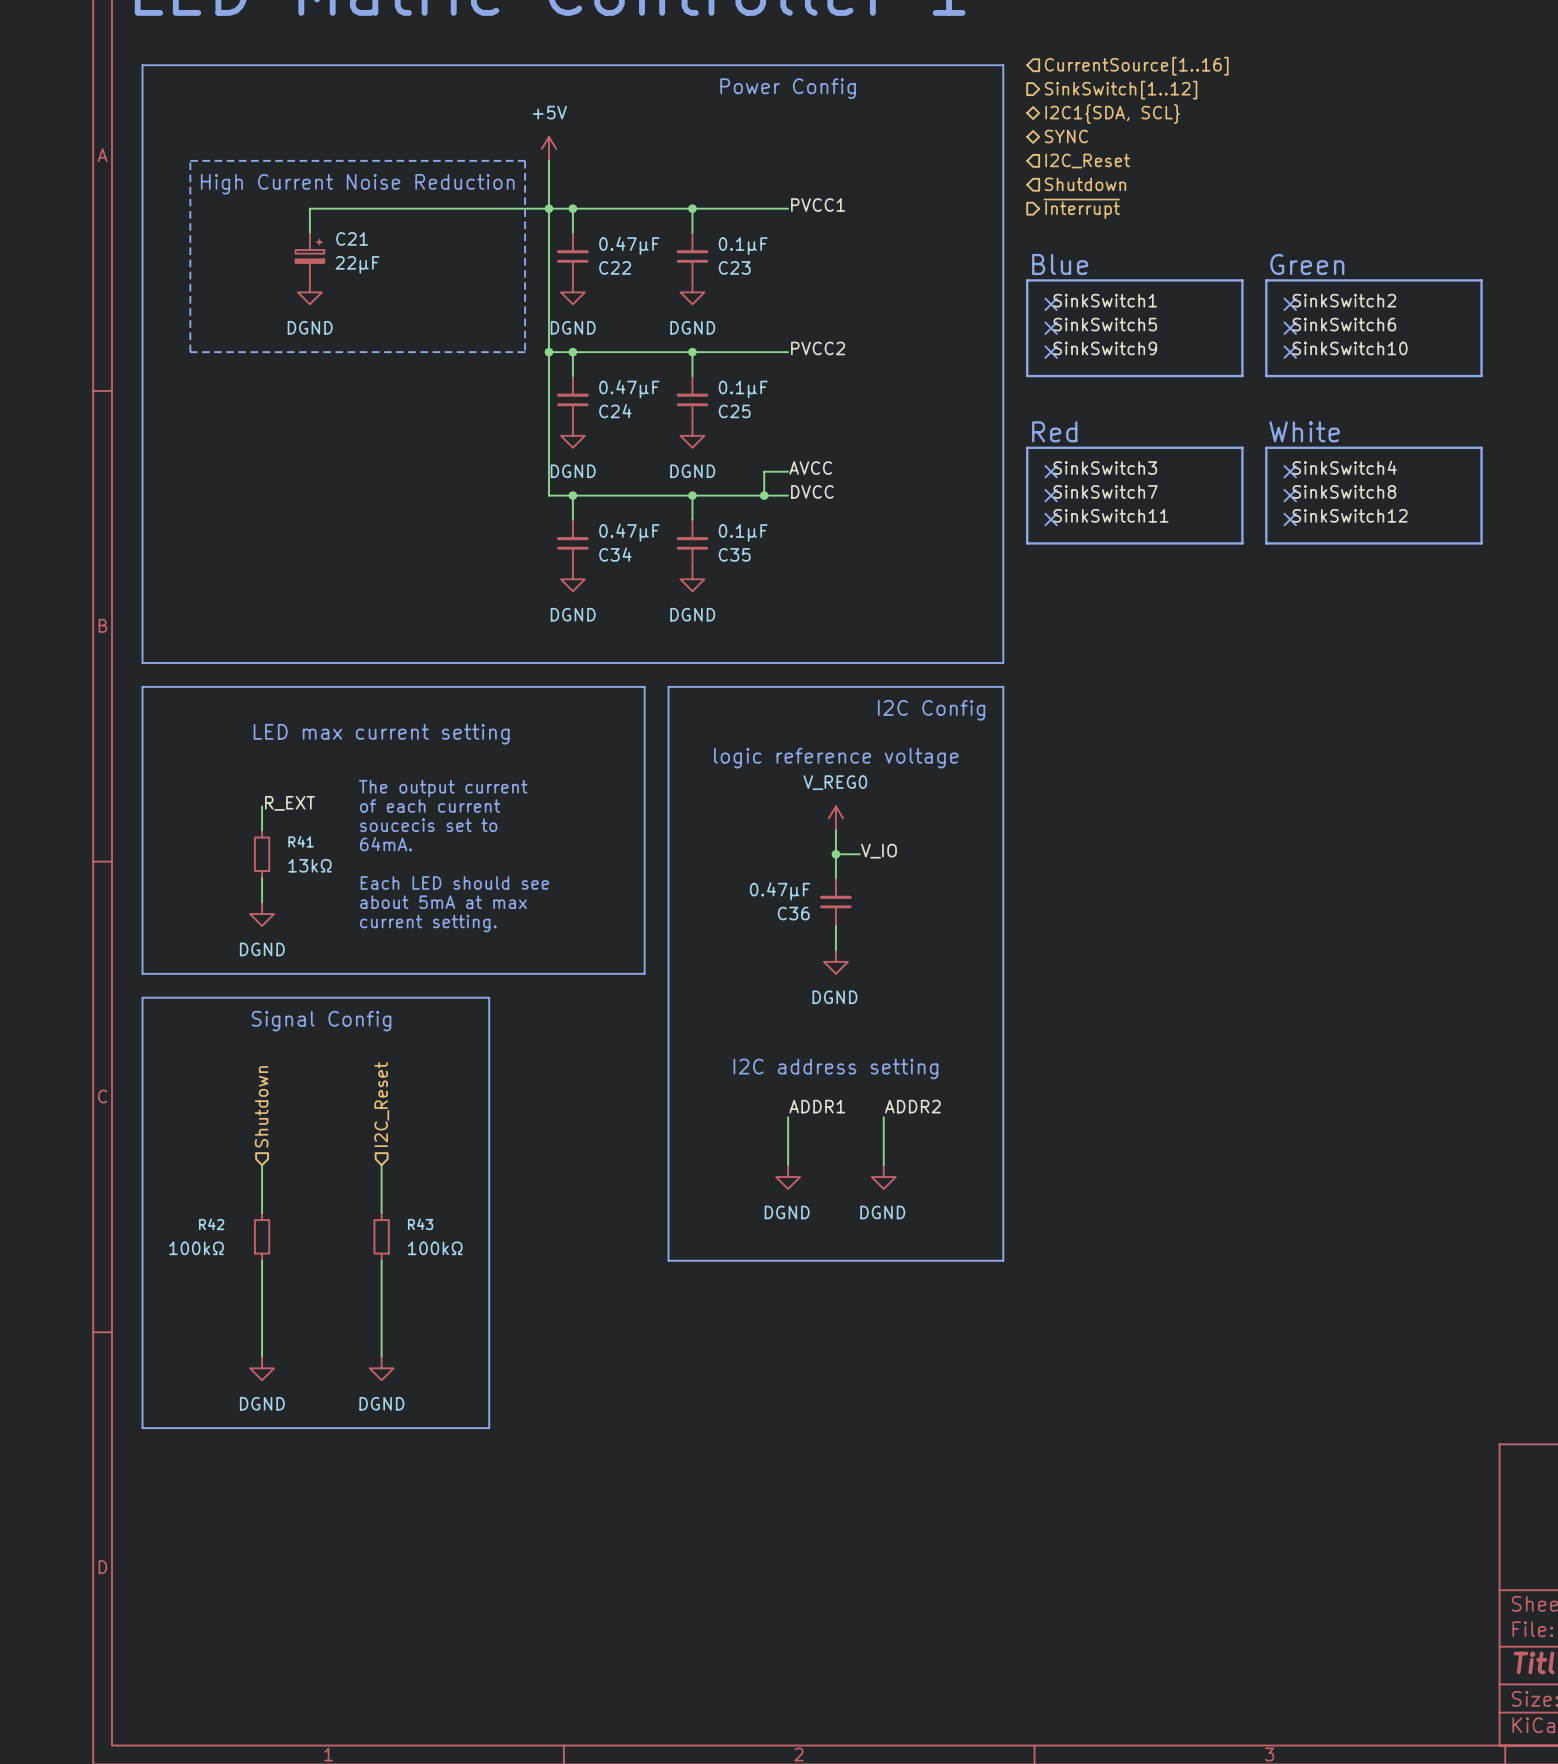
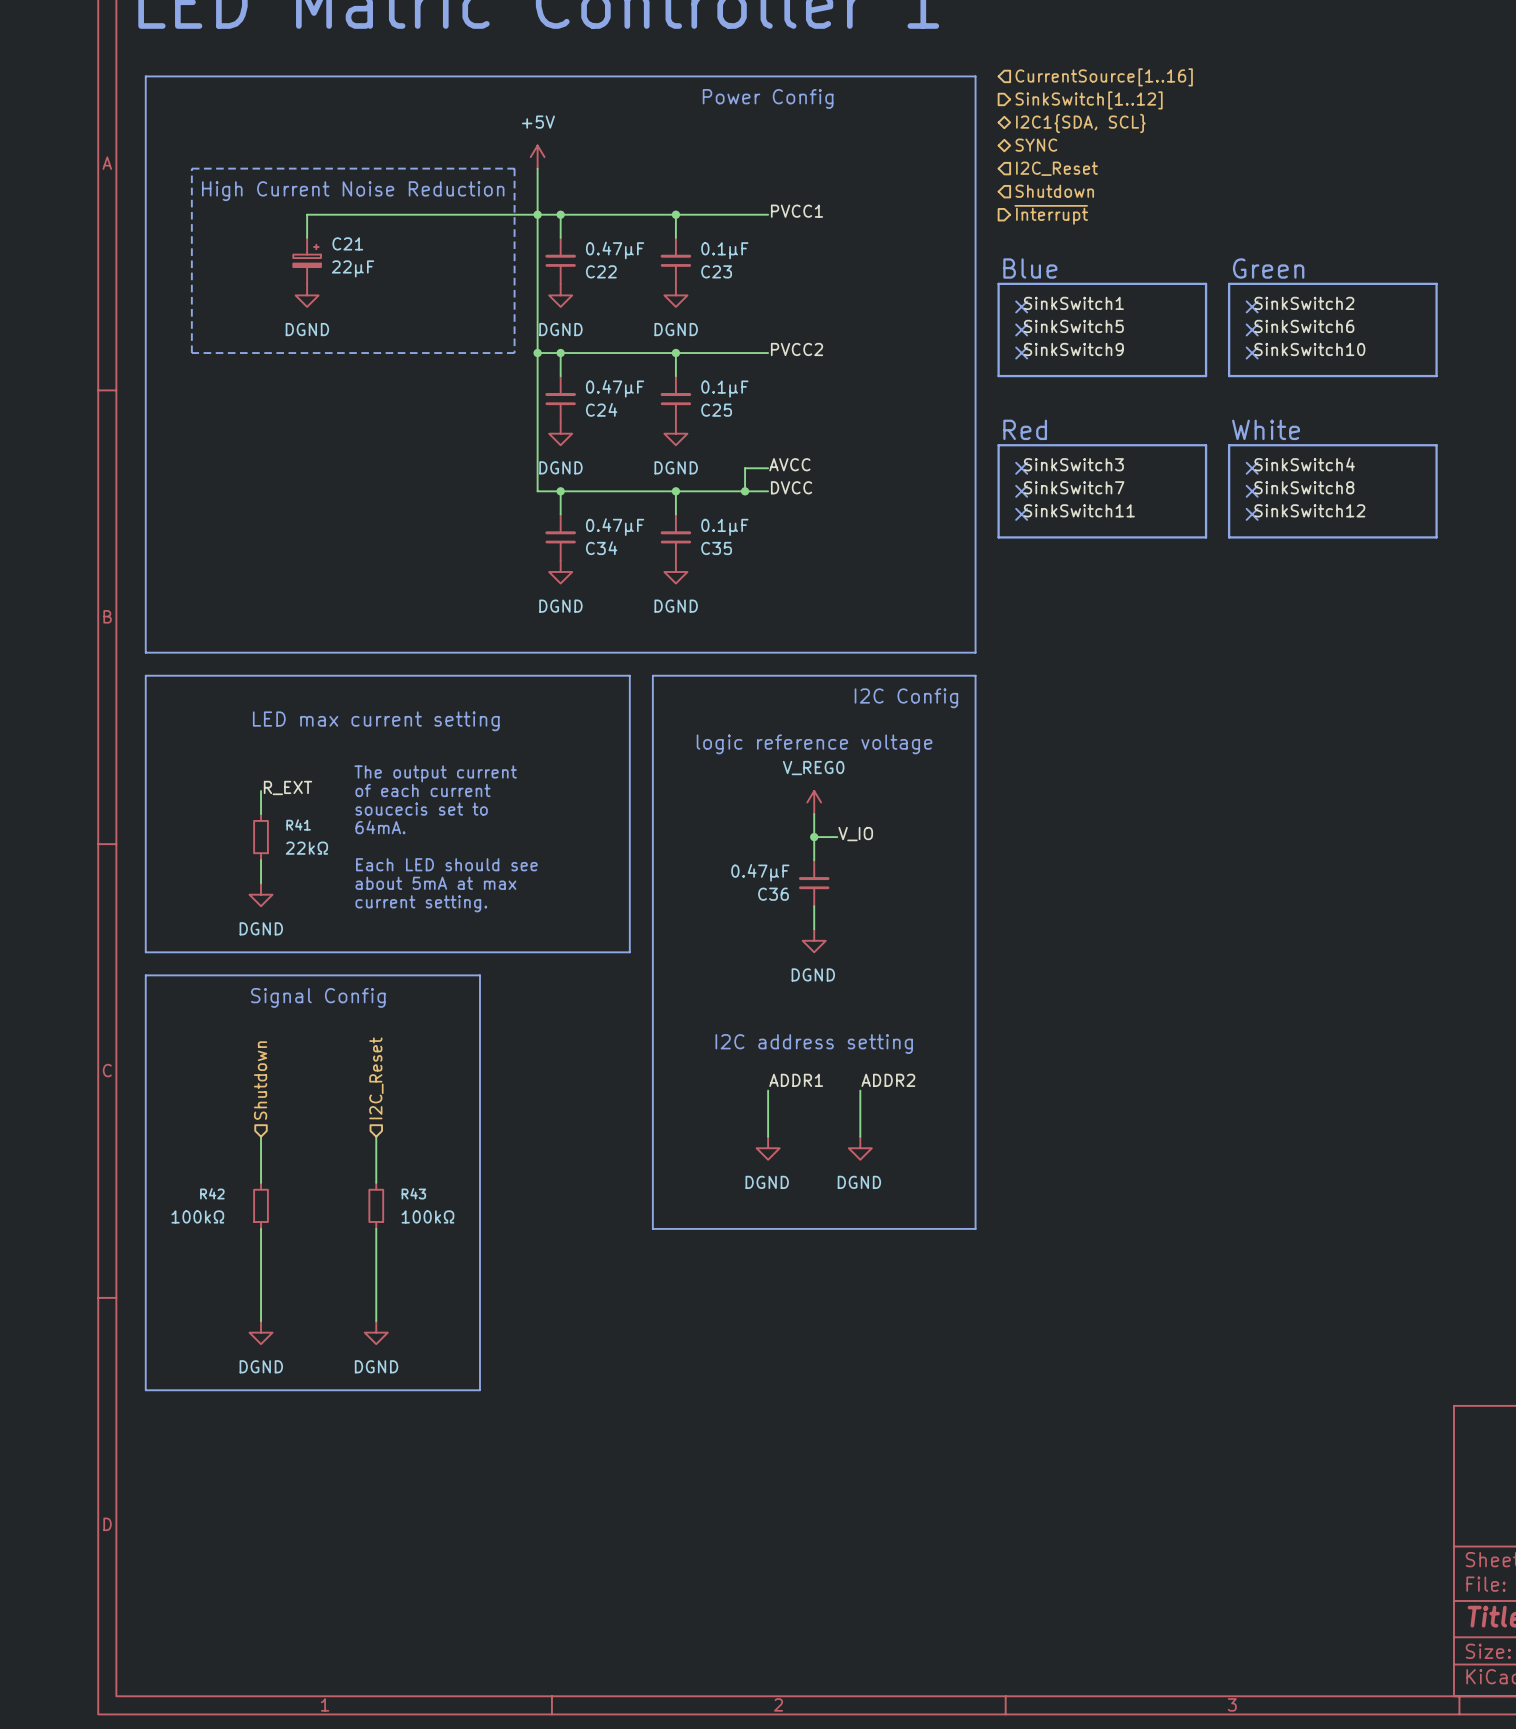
R41 value: 13kΩ (309, 865) -> 22kΩ (306, 848)

